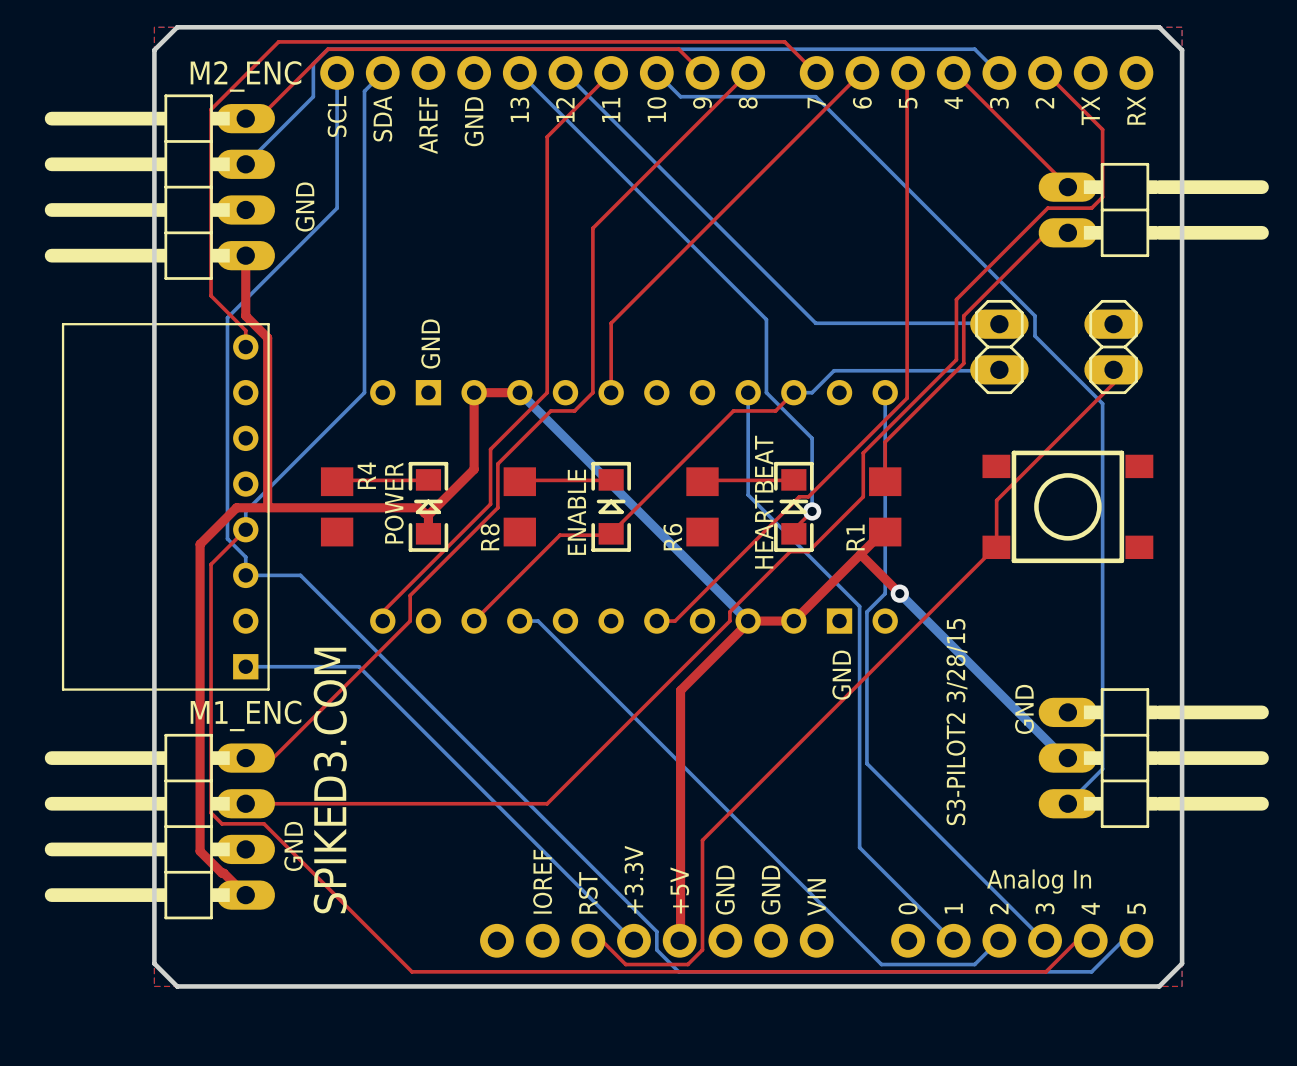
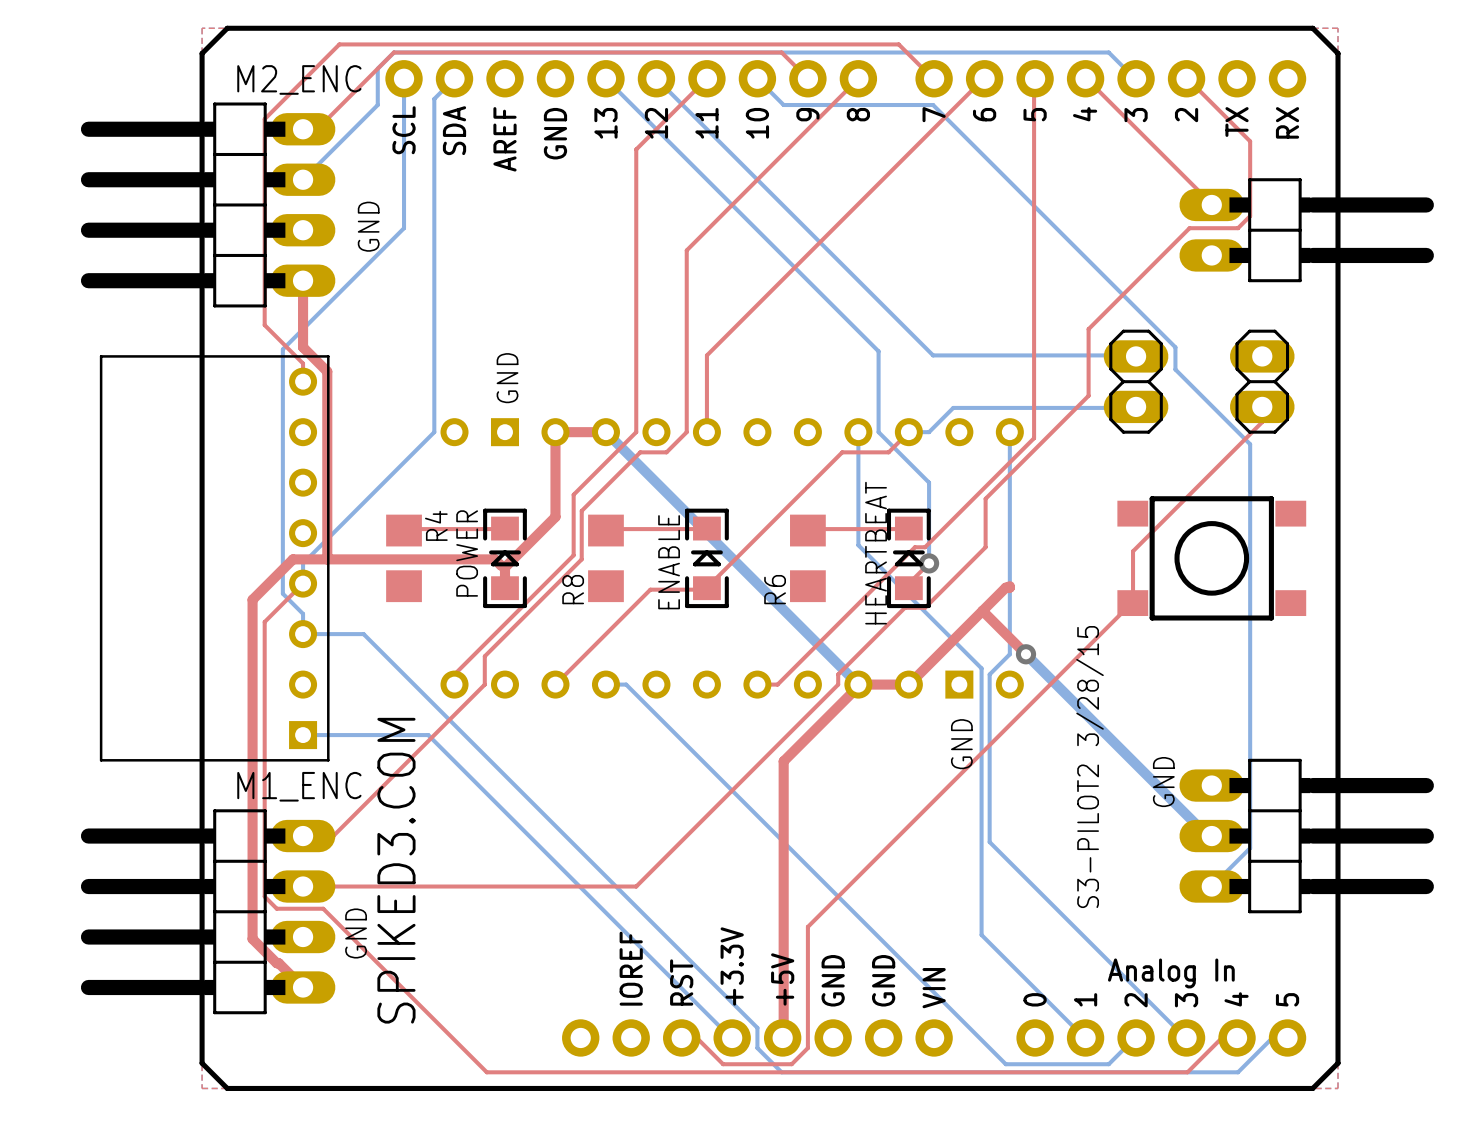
top track: (1067, 232) (1045, 233) (963, 315) (963, 363) (885, 442) (885, 481) -> none
R1: (885, 506) -> none

